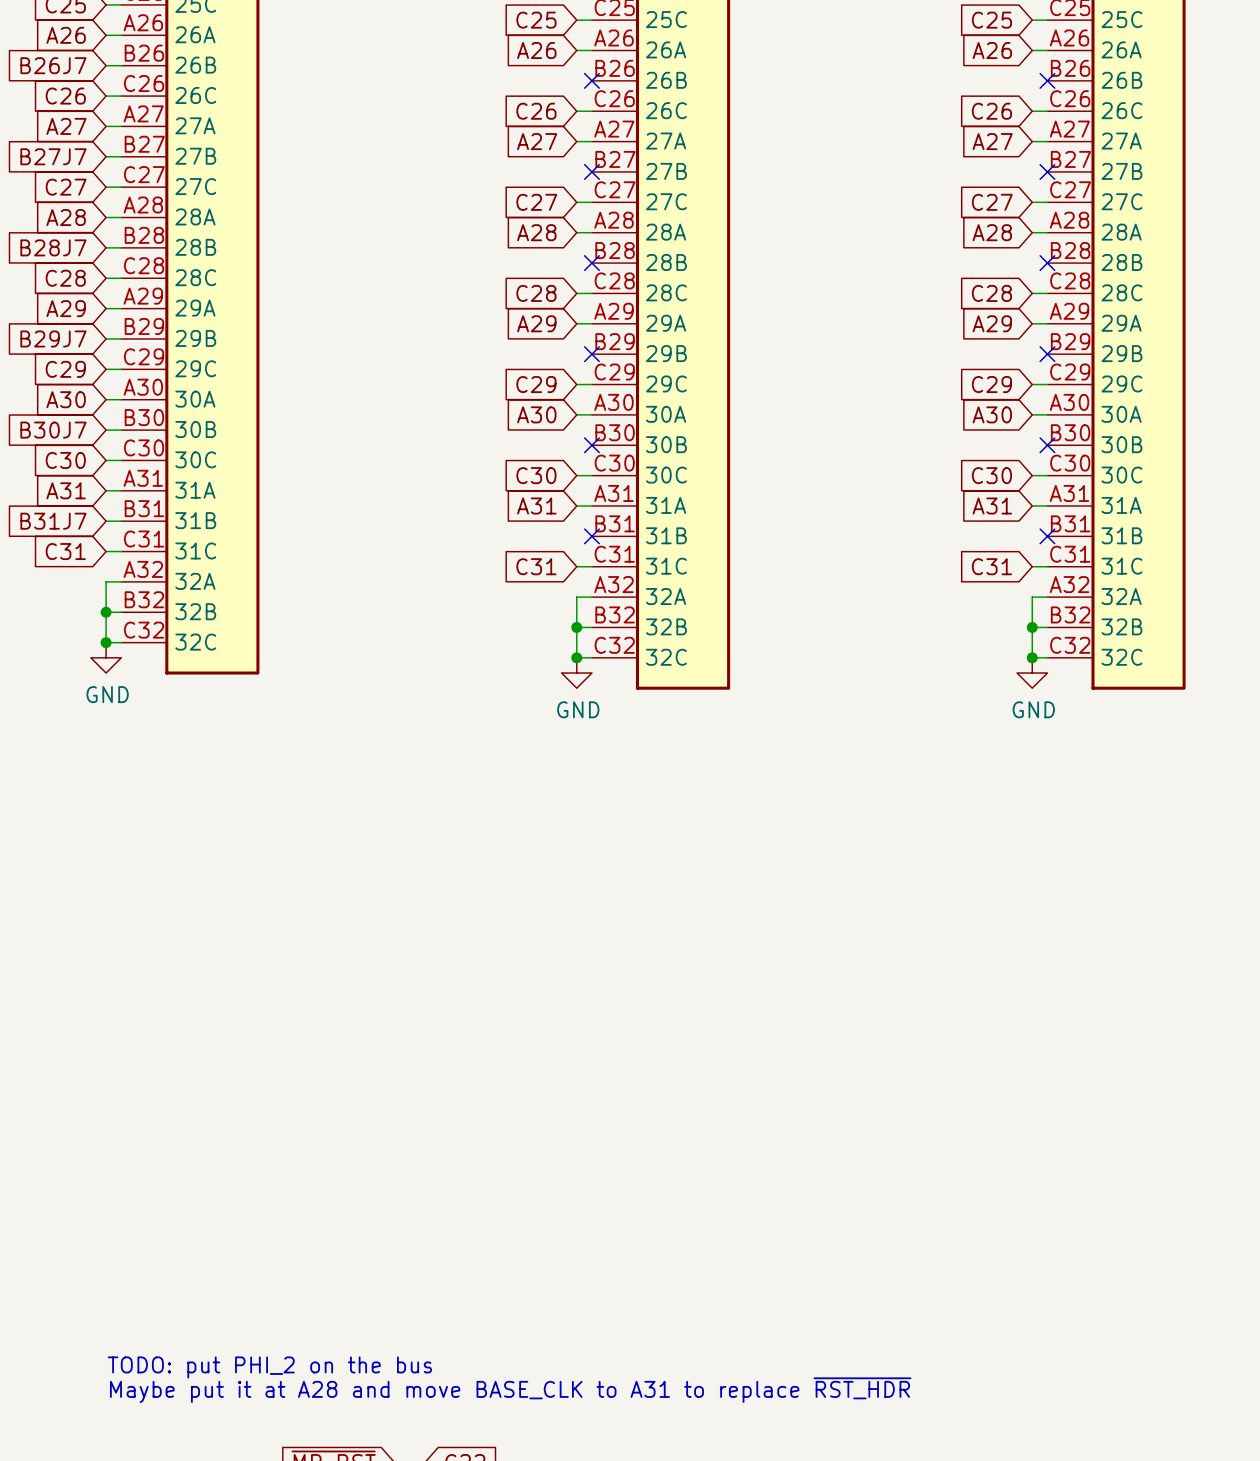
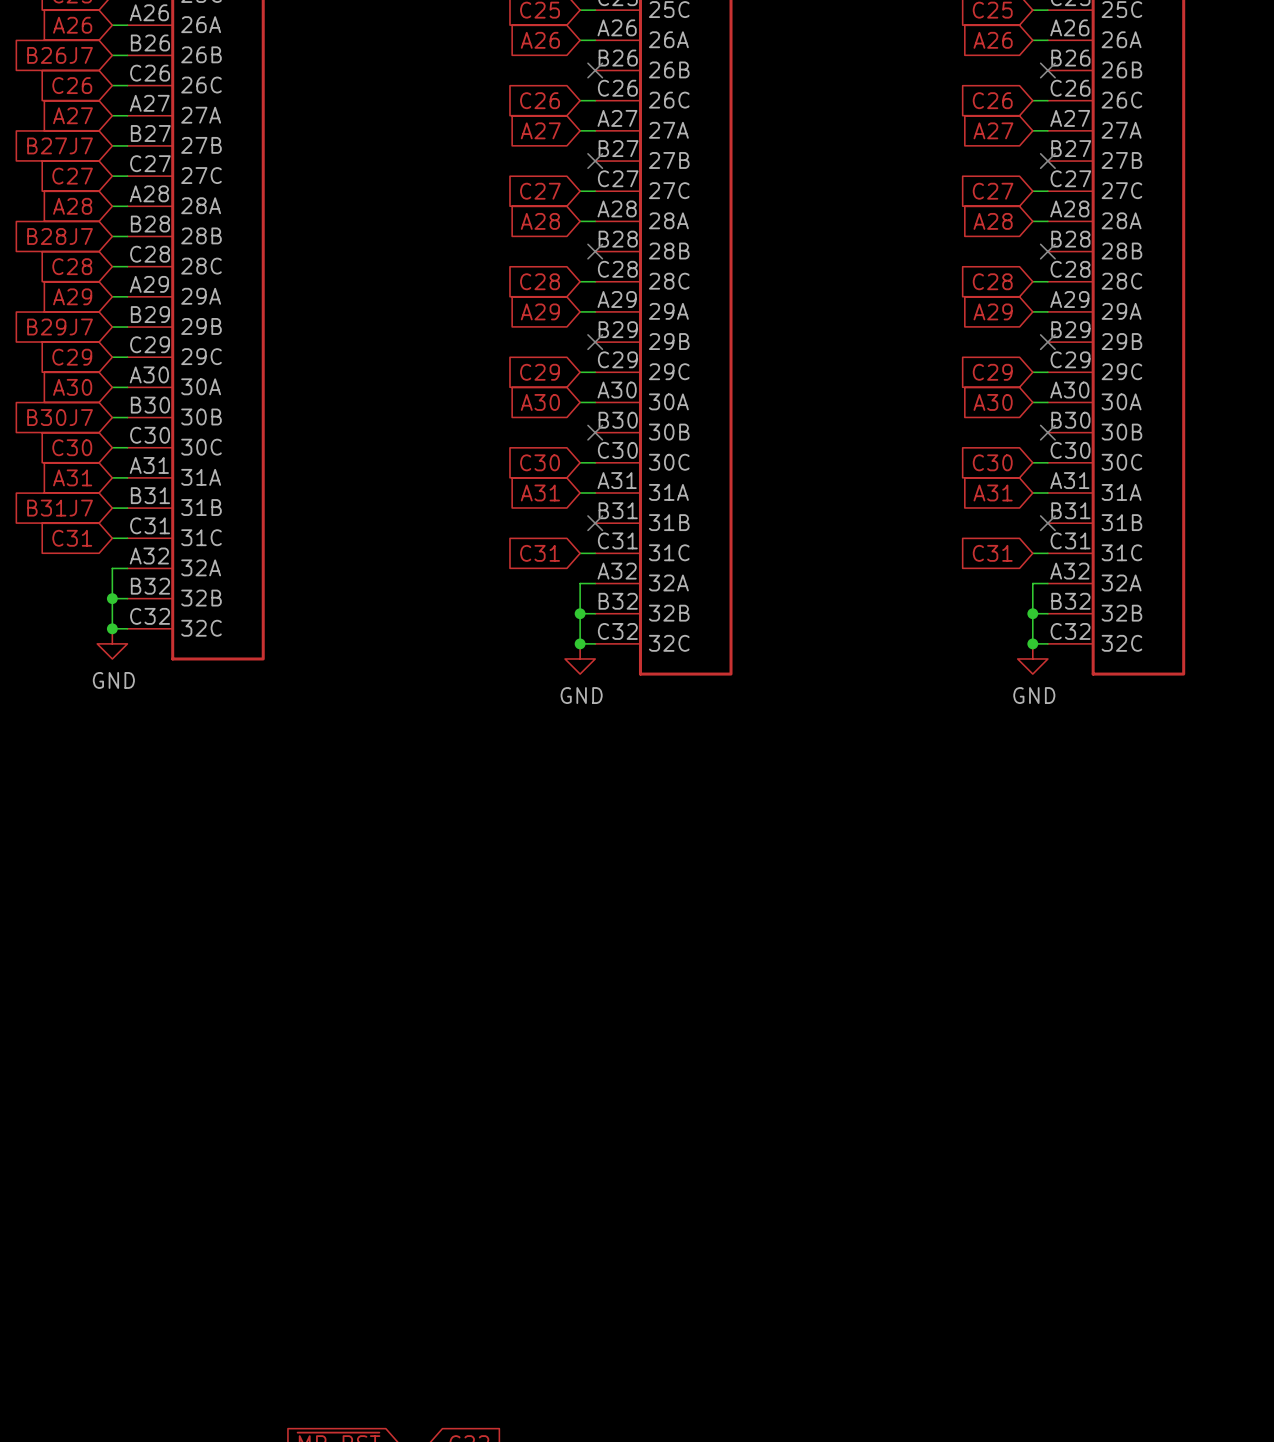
text: TODO: put PHI_2 on the bus (269, 1367) -> none
text: Maybe put it at A28 and move BASE_CLK to A31 to replace ~{RST_HDR} (510, 1390) -> none

